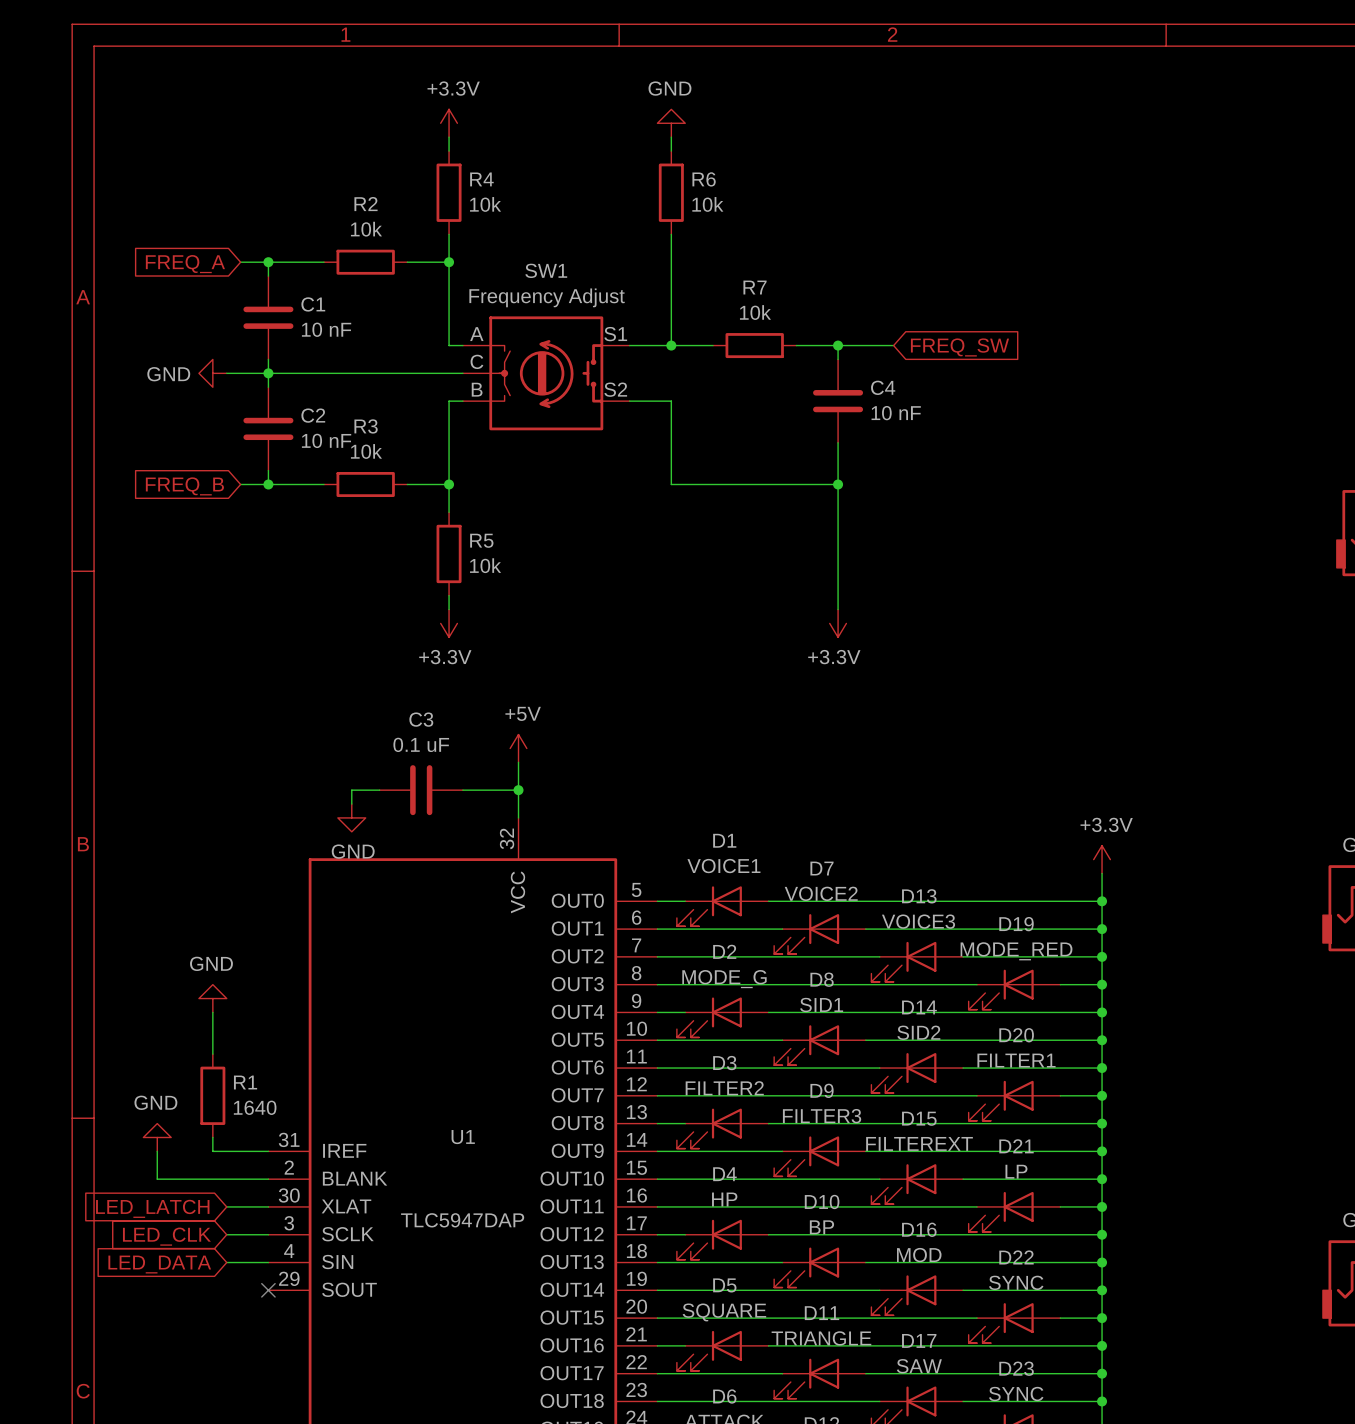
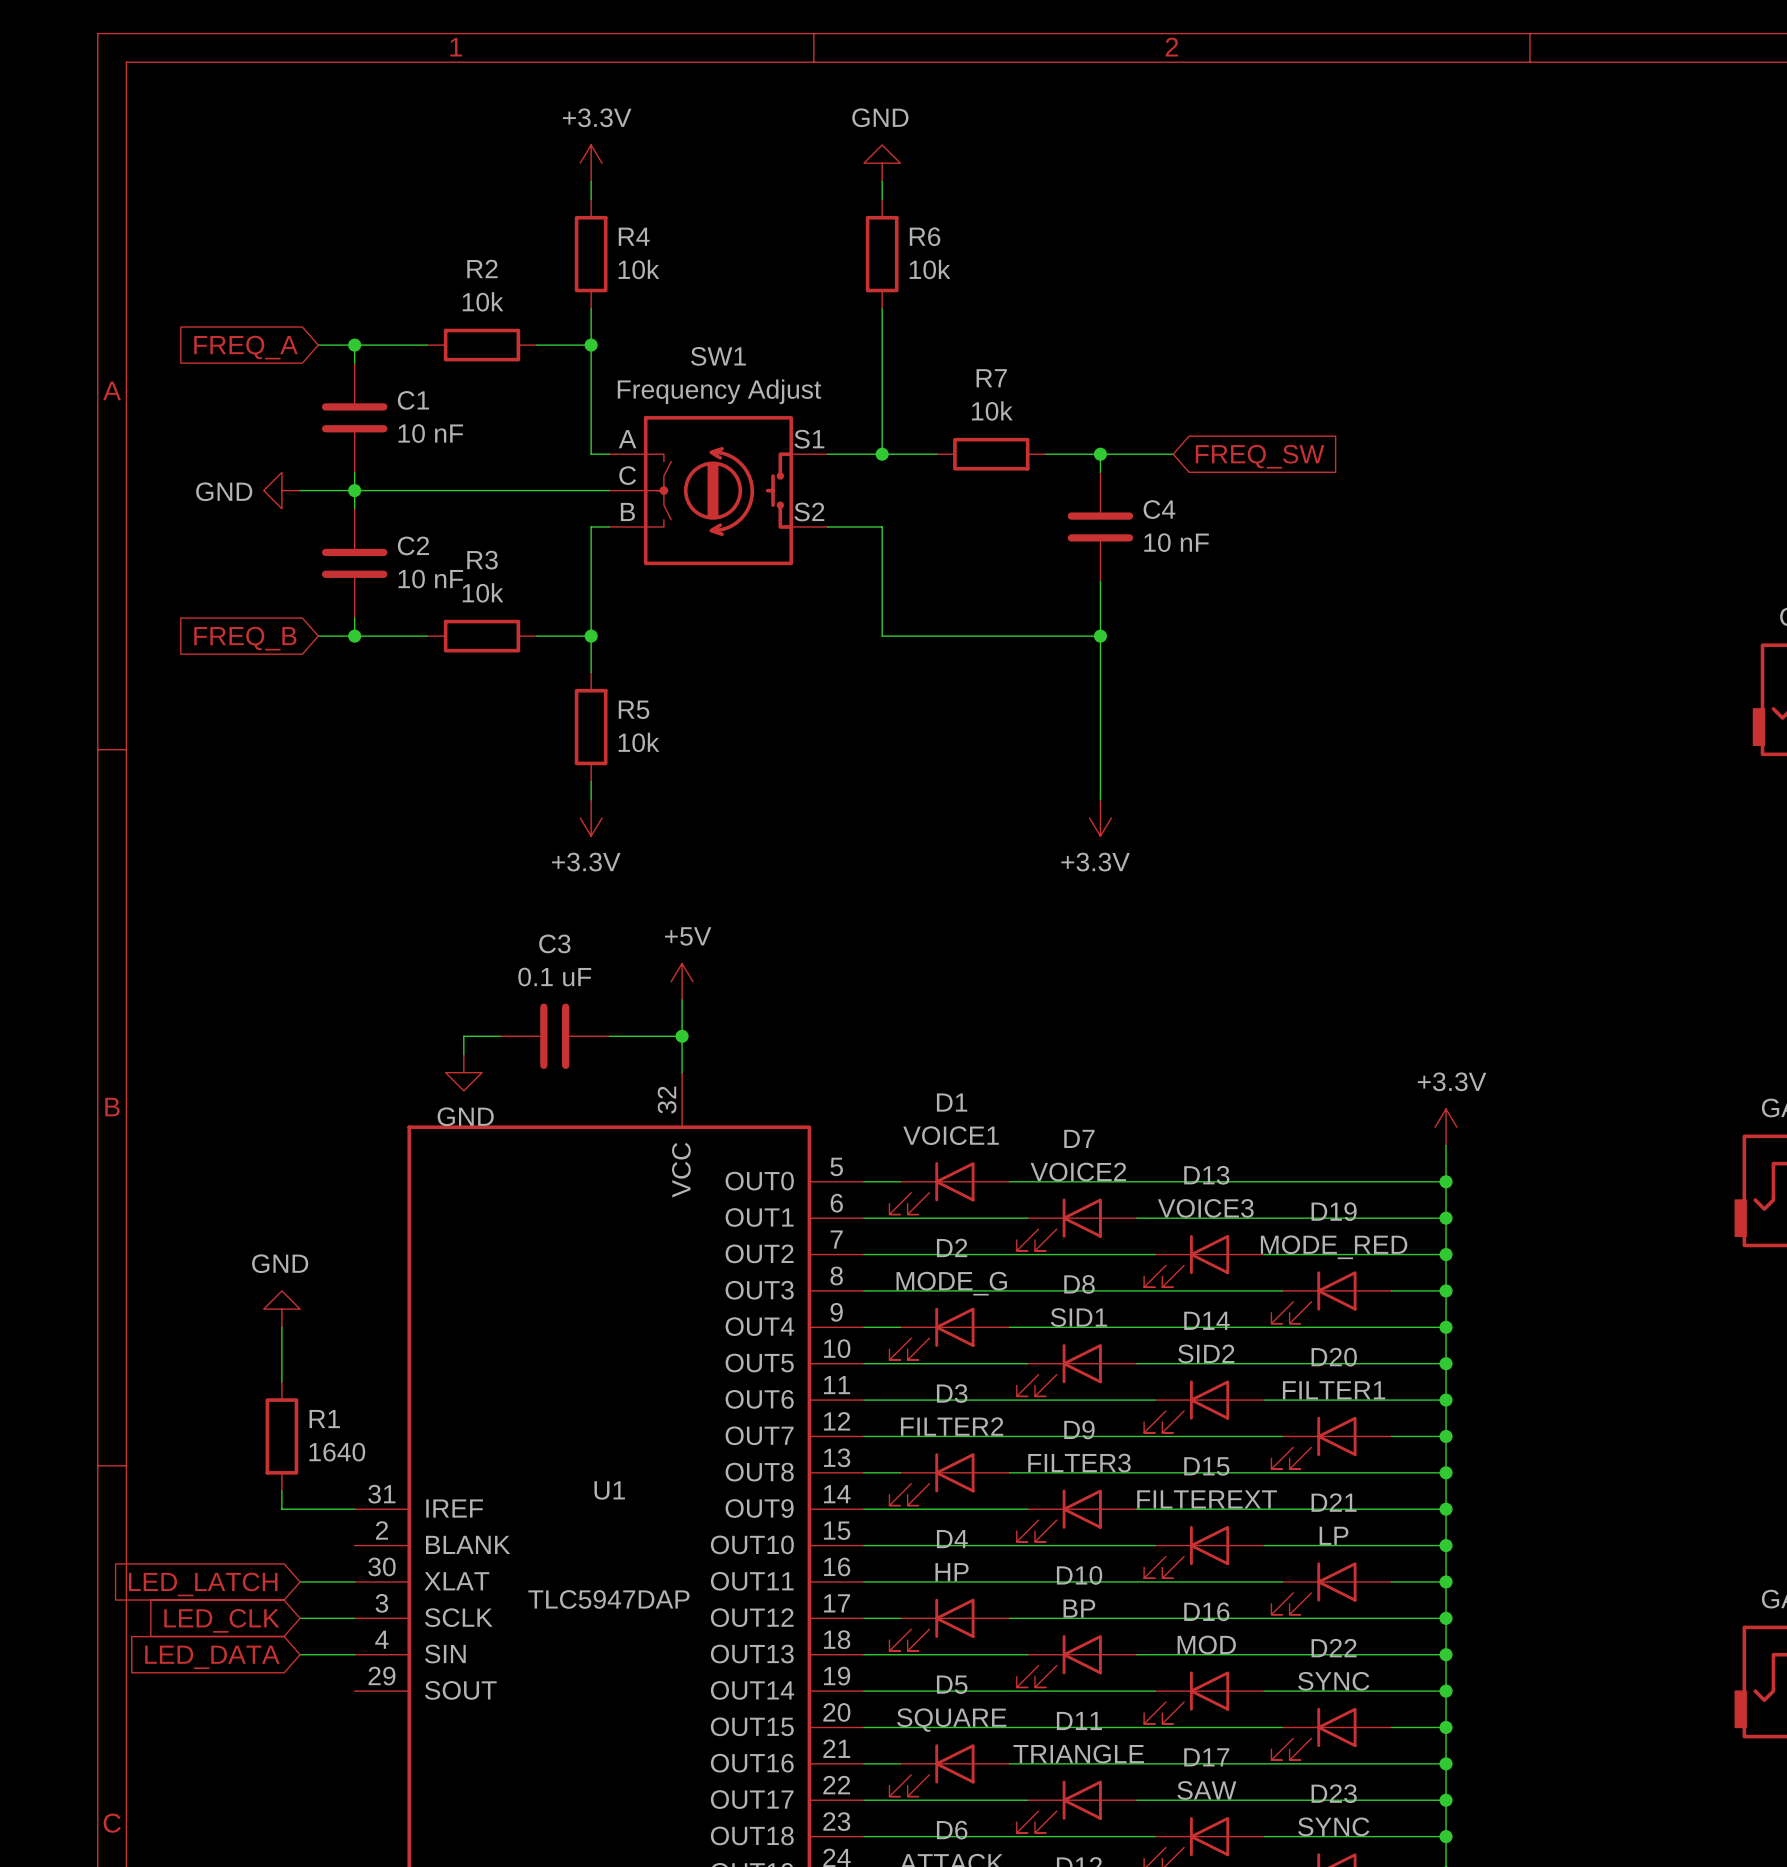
power symbol: GND (157, 1137) -> none
wire: (157, 1151) (157, 1179) (268, 1179) -> none
no-connect mark: (268, 1290) -> none

